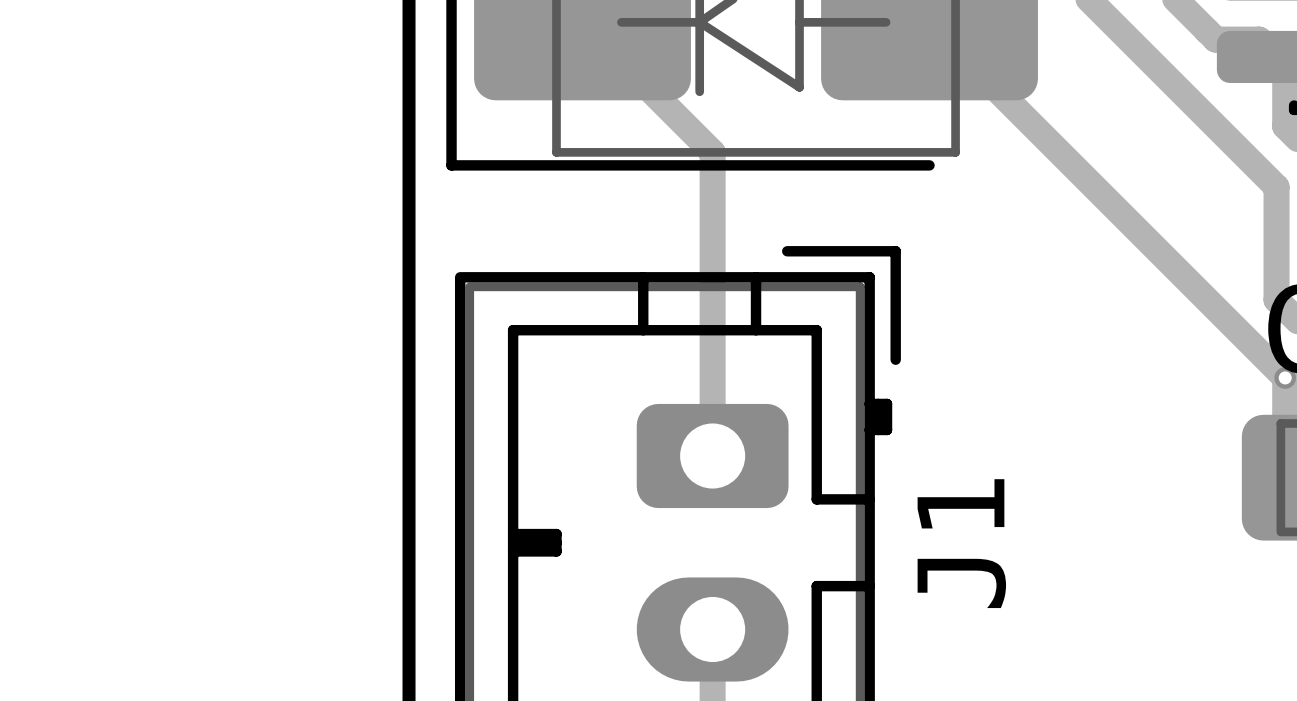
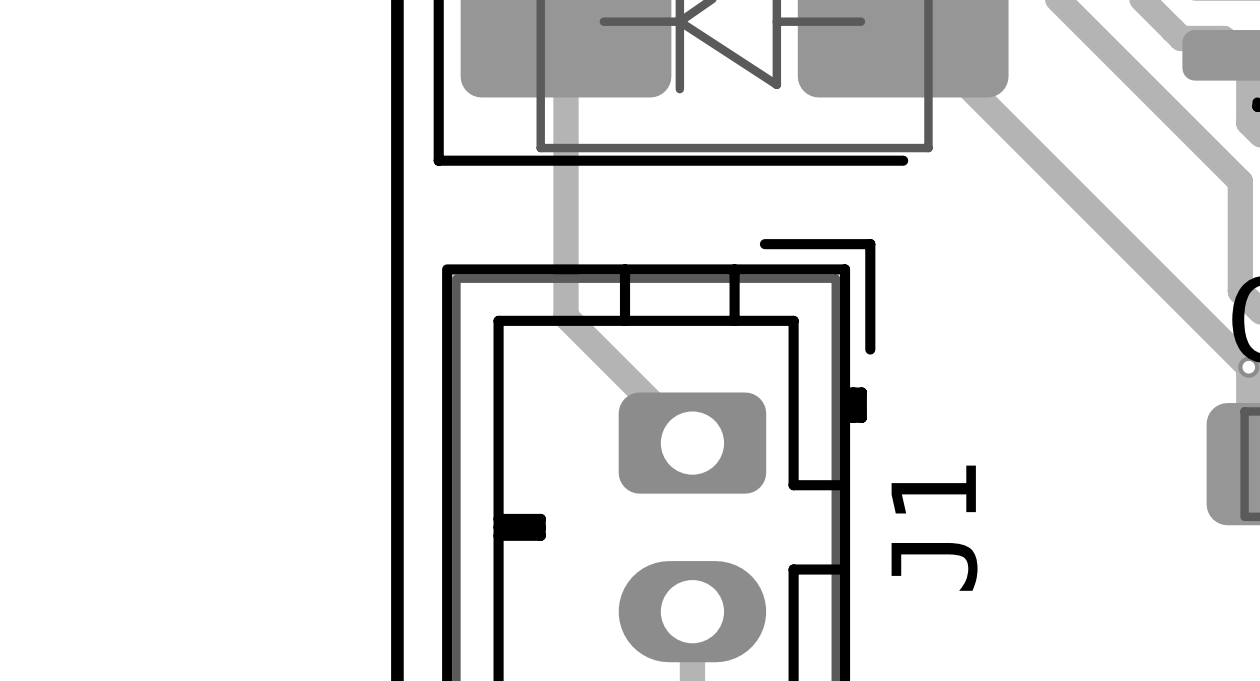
track: (582, 22) (712, 152) (712, 456) -> (566, 21) (566, 316) (692, 443)

